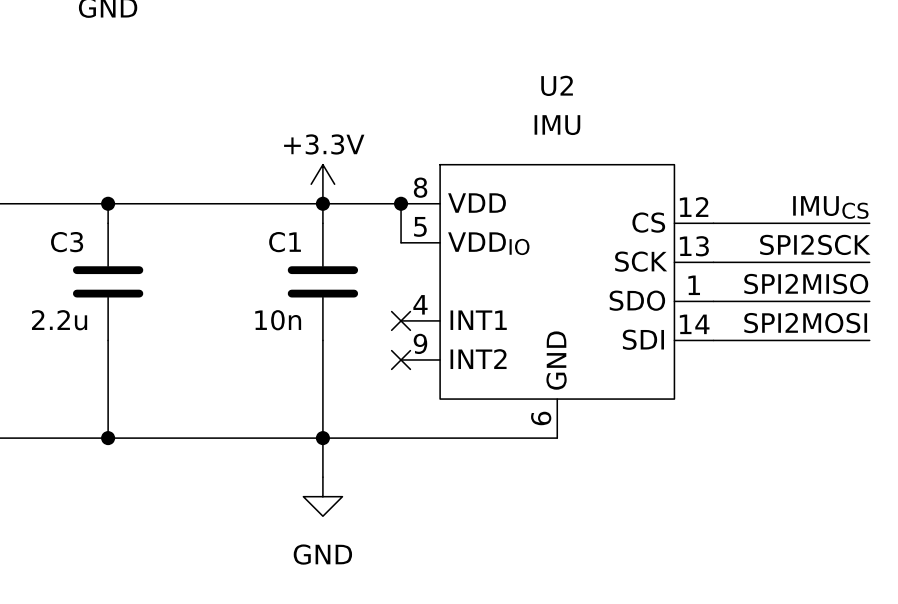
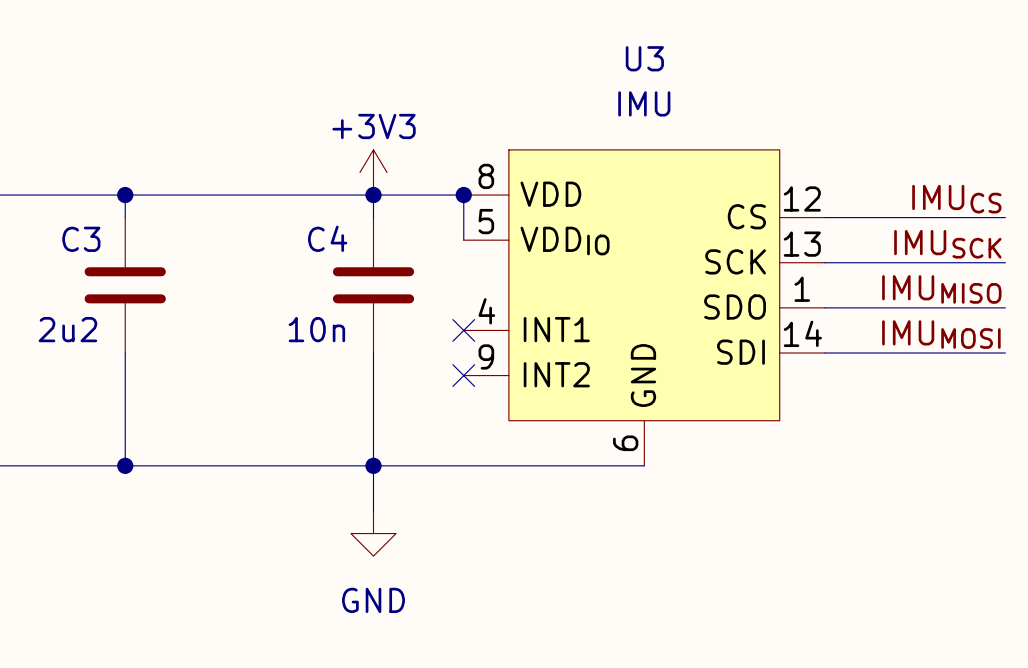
U2 name: U2 (557, 85) -> U3 (644, 58)
power symbol: +3.3V (322, 184) -> +3V3 (373, 172)
C1 name: C1 (285, 242) -> C4 (327, 238)
label: SPI2SCK (815, 244) -> IMUSCK (947, 244)
label: SPI2MISO (806, 283) -> IMUMISO (941, 289)
C3 value: 2.2u (59, 320) -> 2u2 (67, 329)
label: SPI2MOSI (805, 323) -> IMUMOSI (941, 334)

